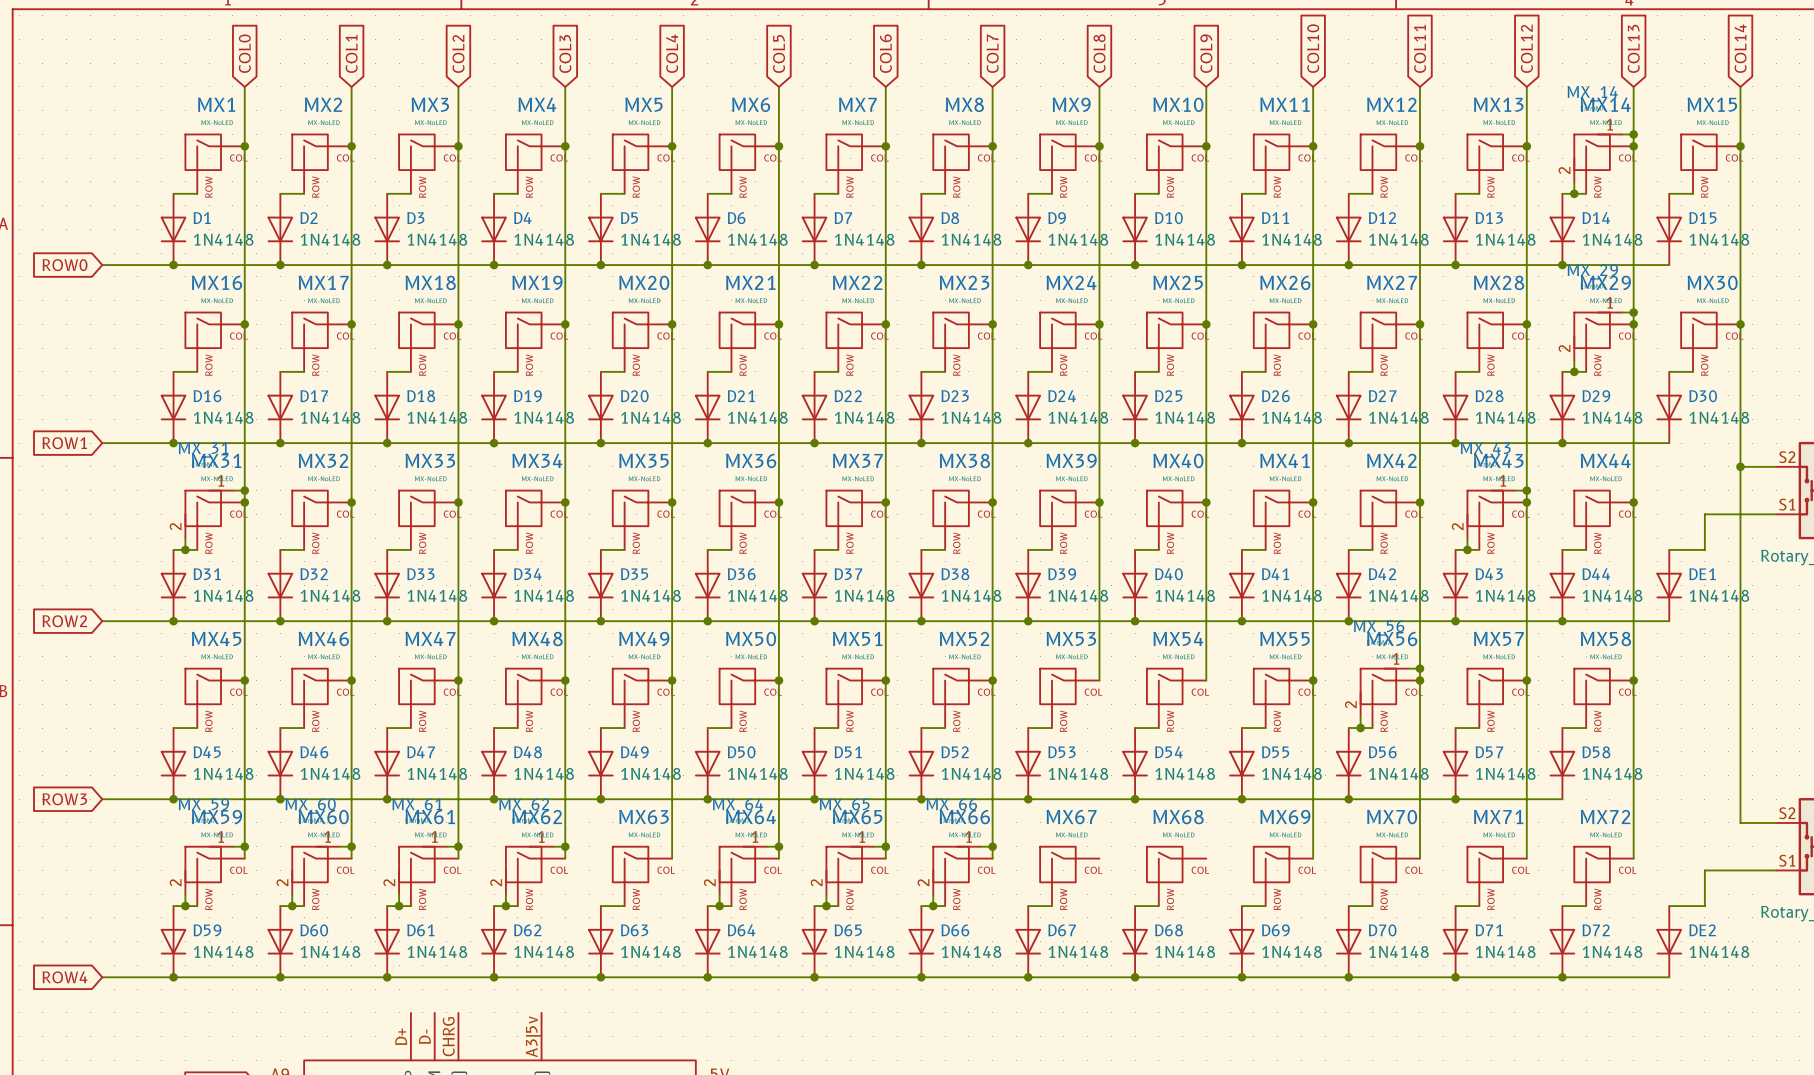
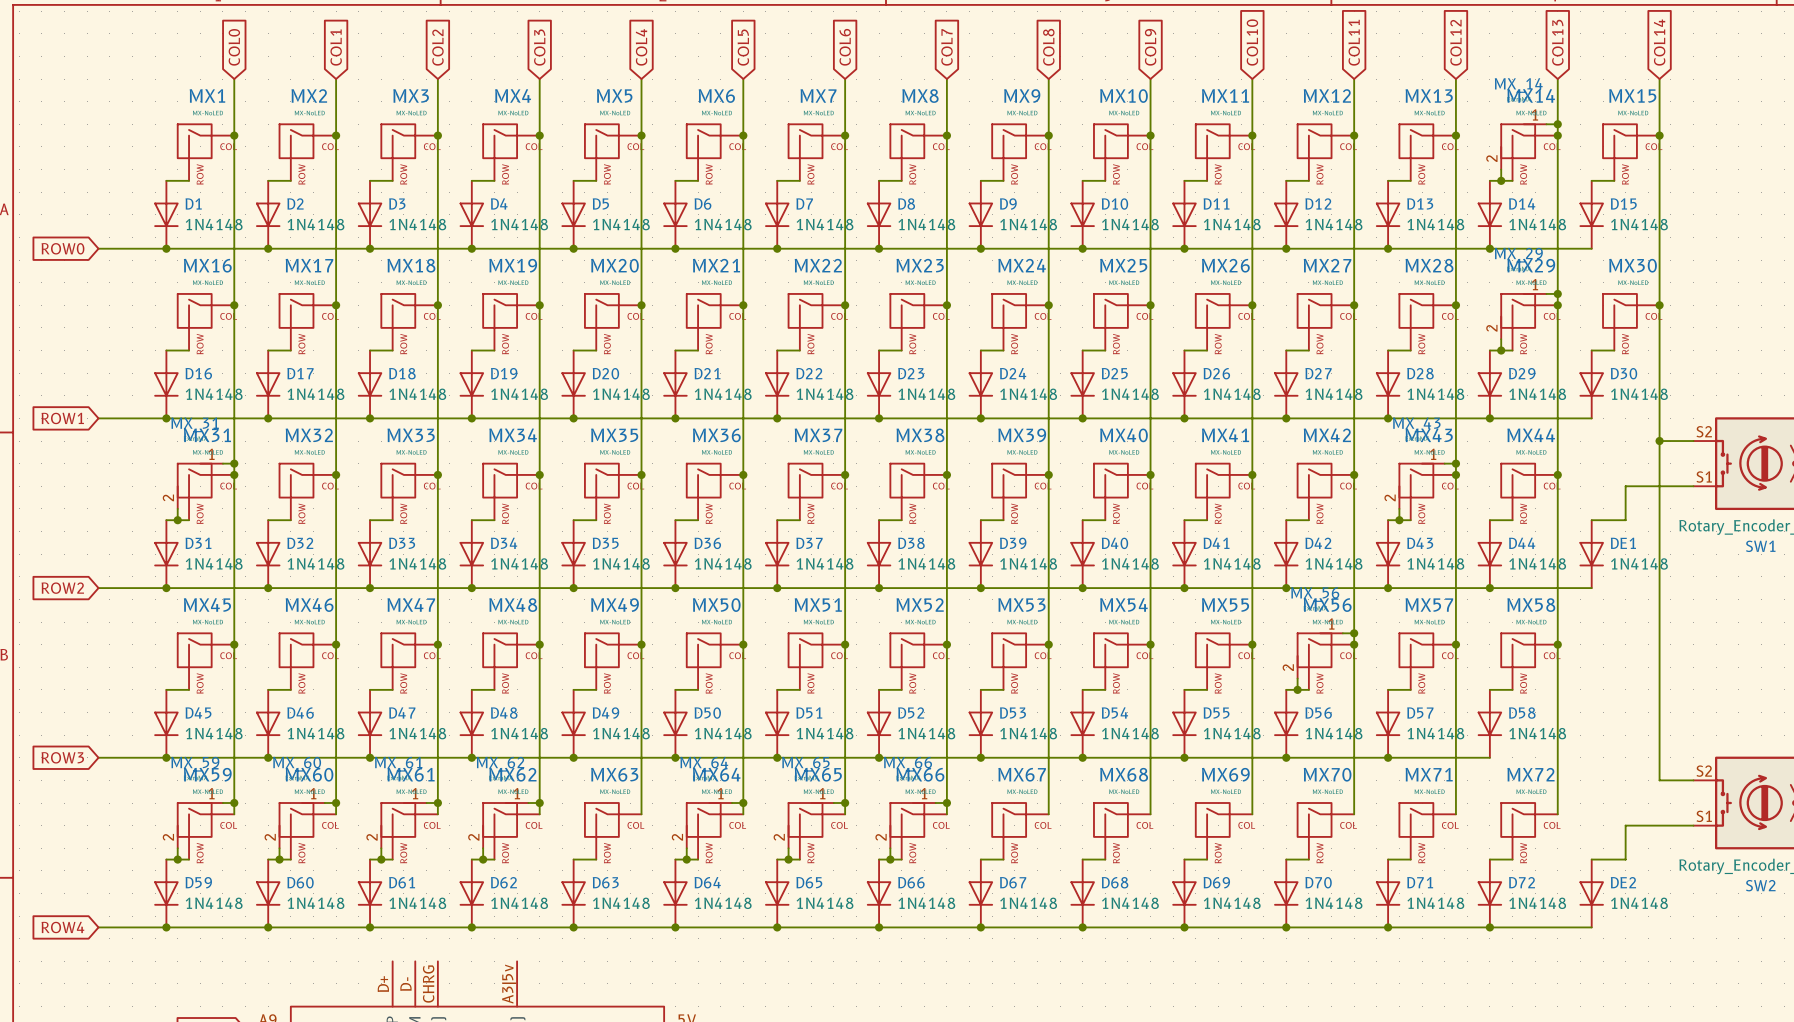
wire: none -> (1048, 644) (1048, 814)
junction: none -> (1048, 644)
wire: none -> (1150, 644) (1150, 814)
junction: none -> (1150, 644)

